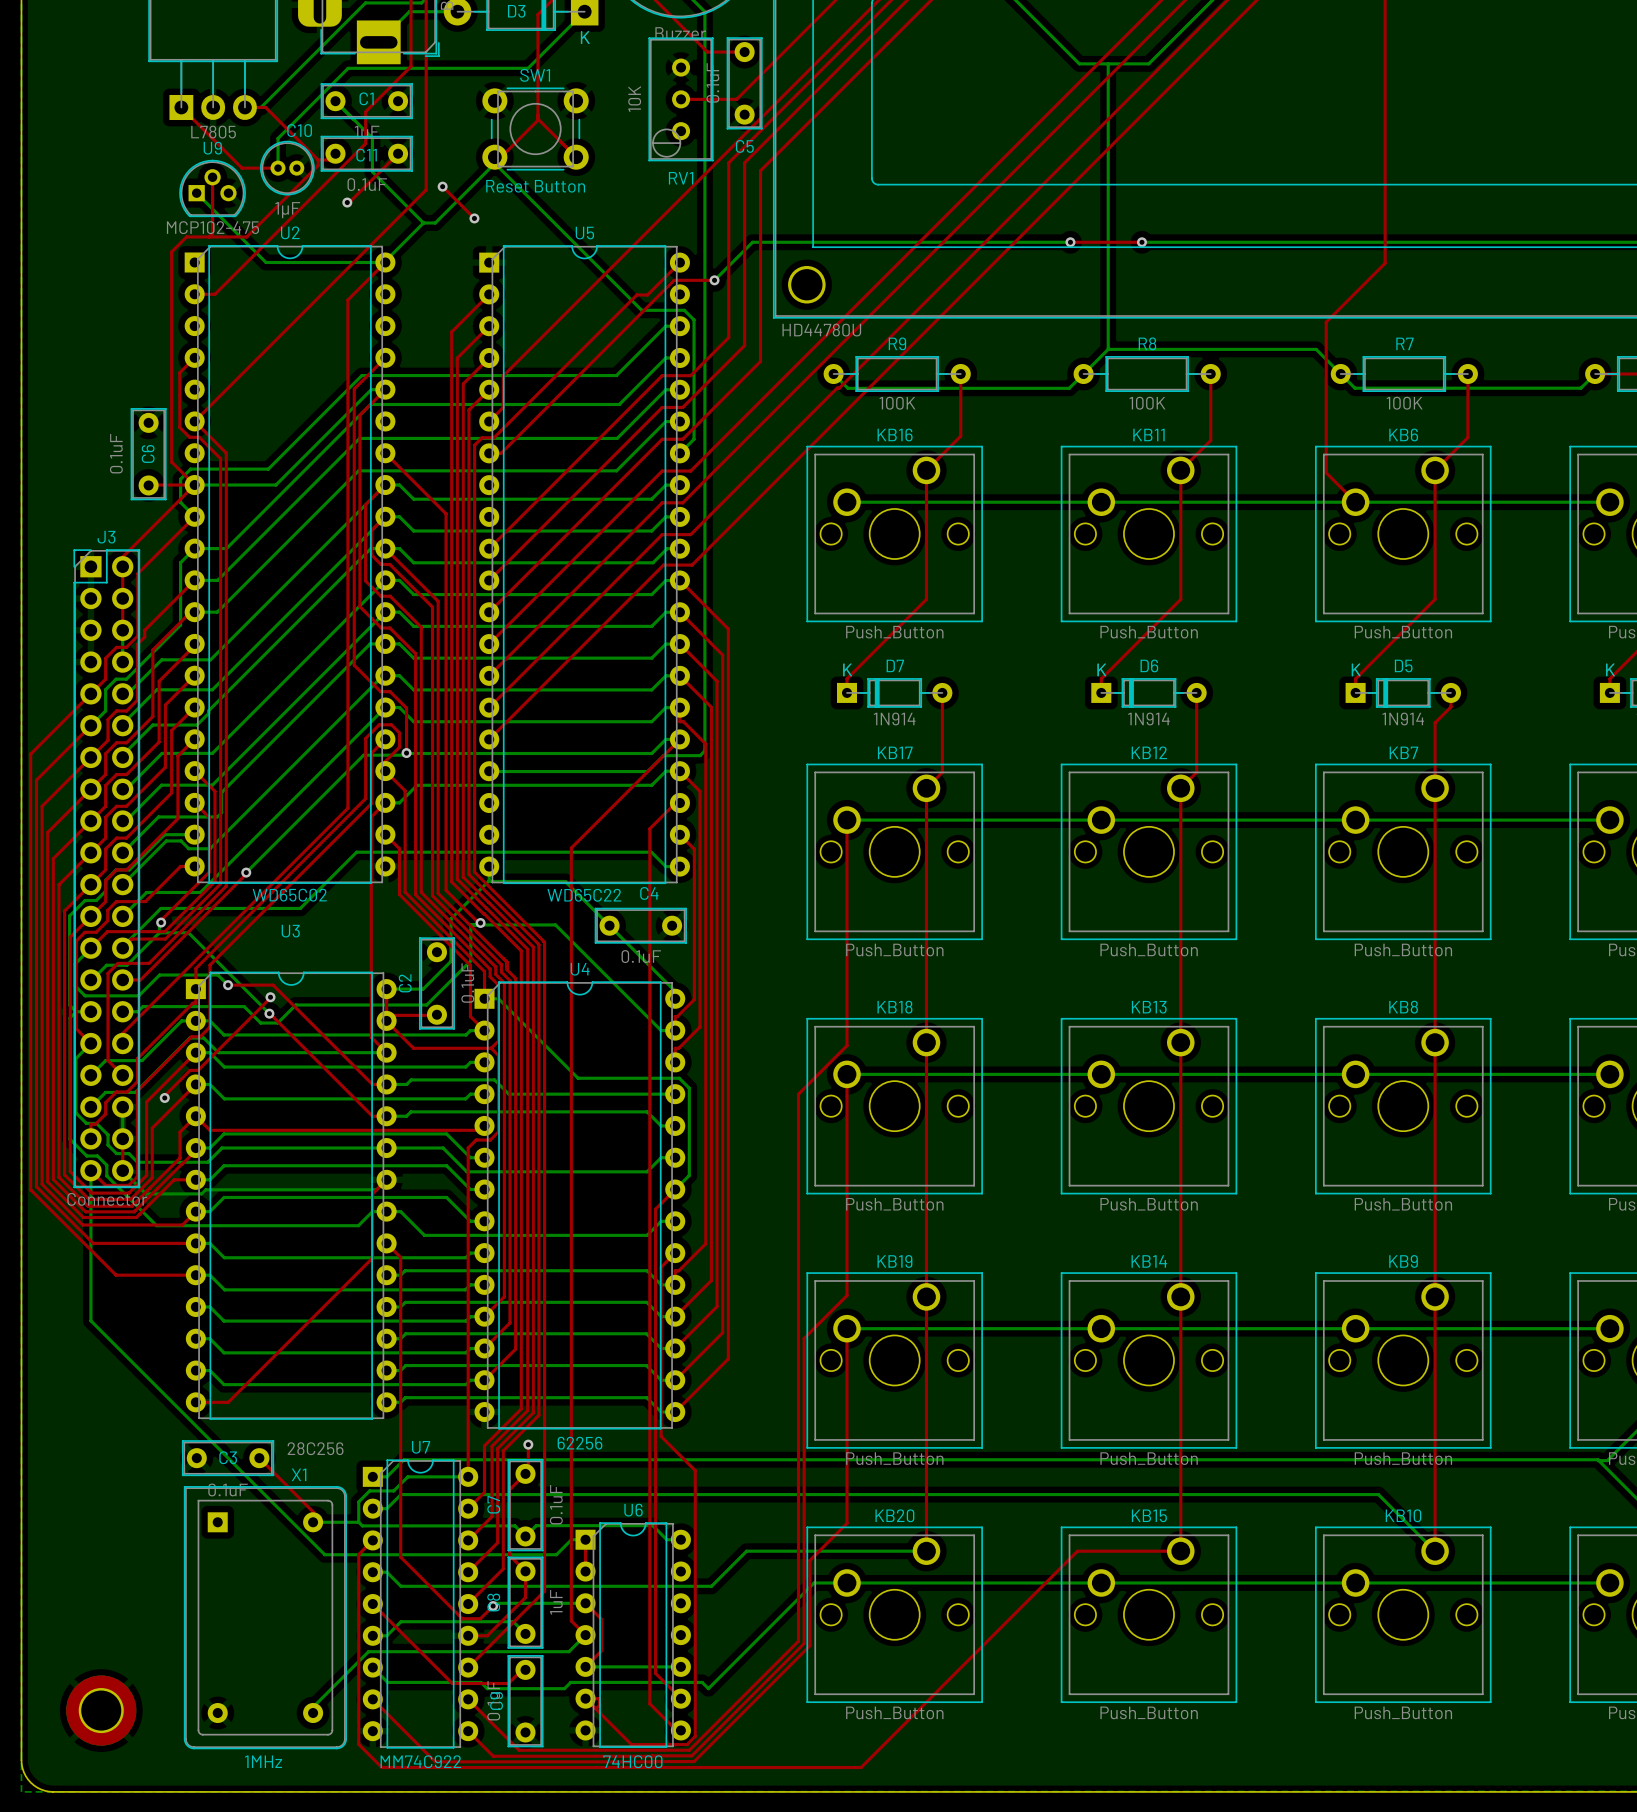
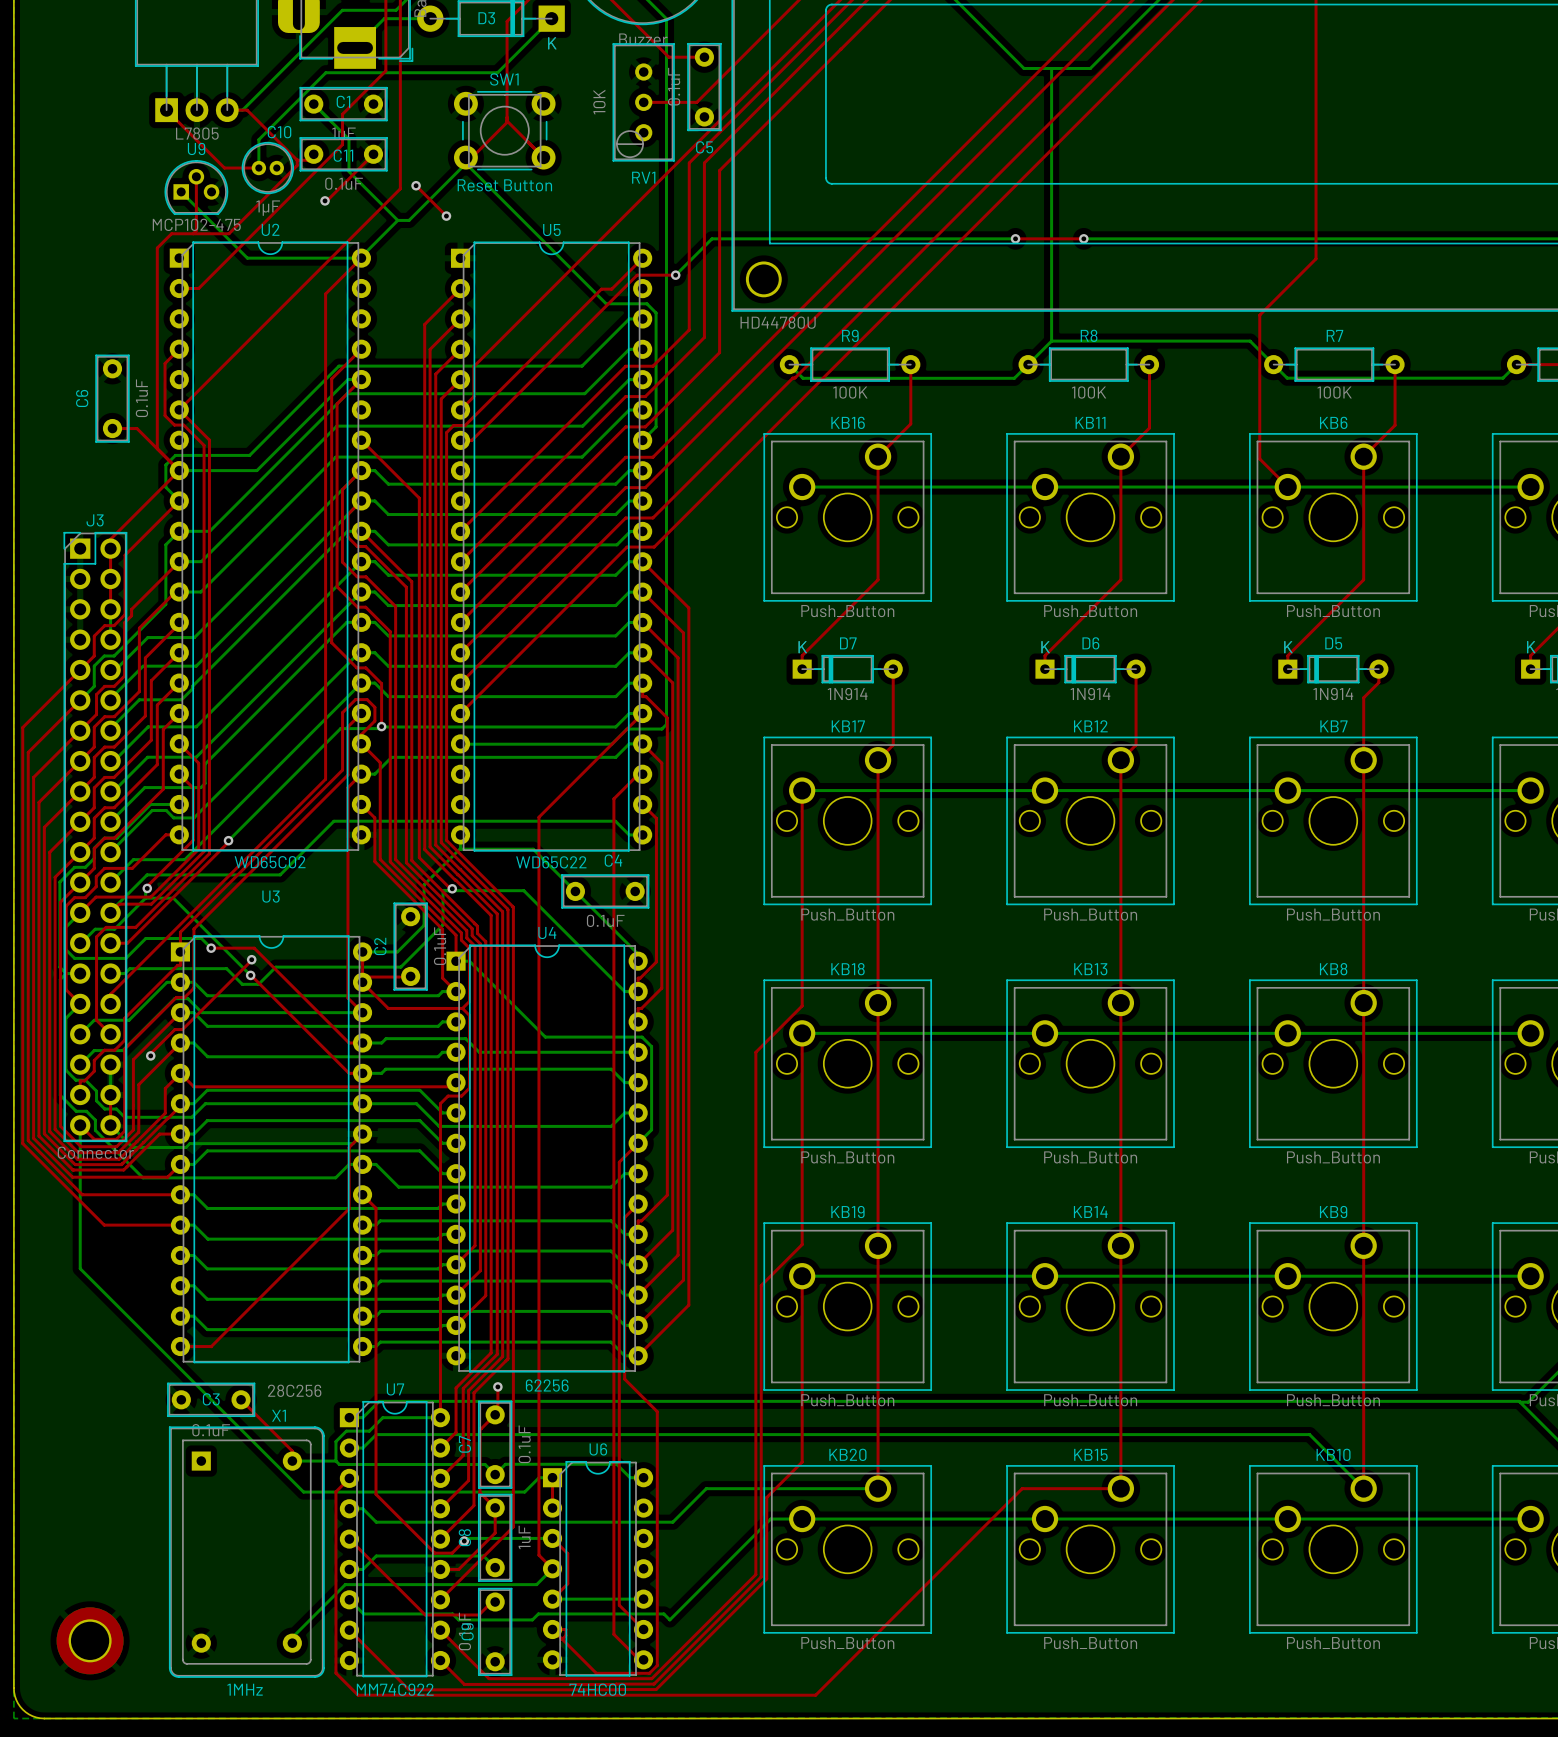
C6 value position: 0.1uF (116, 453) -> 0.1uF (141, 398)
C6 name position: C6 (148, 453) -> C6 (82, 398)
C6 position: (148, 454) -> (112, 398)
top track: (194, 485) (148, 485) -> (179, 470) (136, 428) (112, 428)

